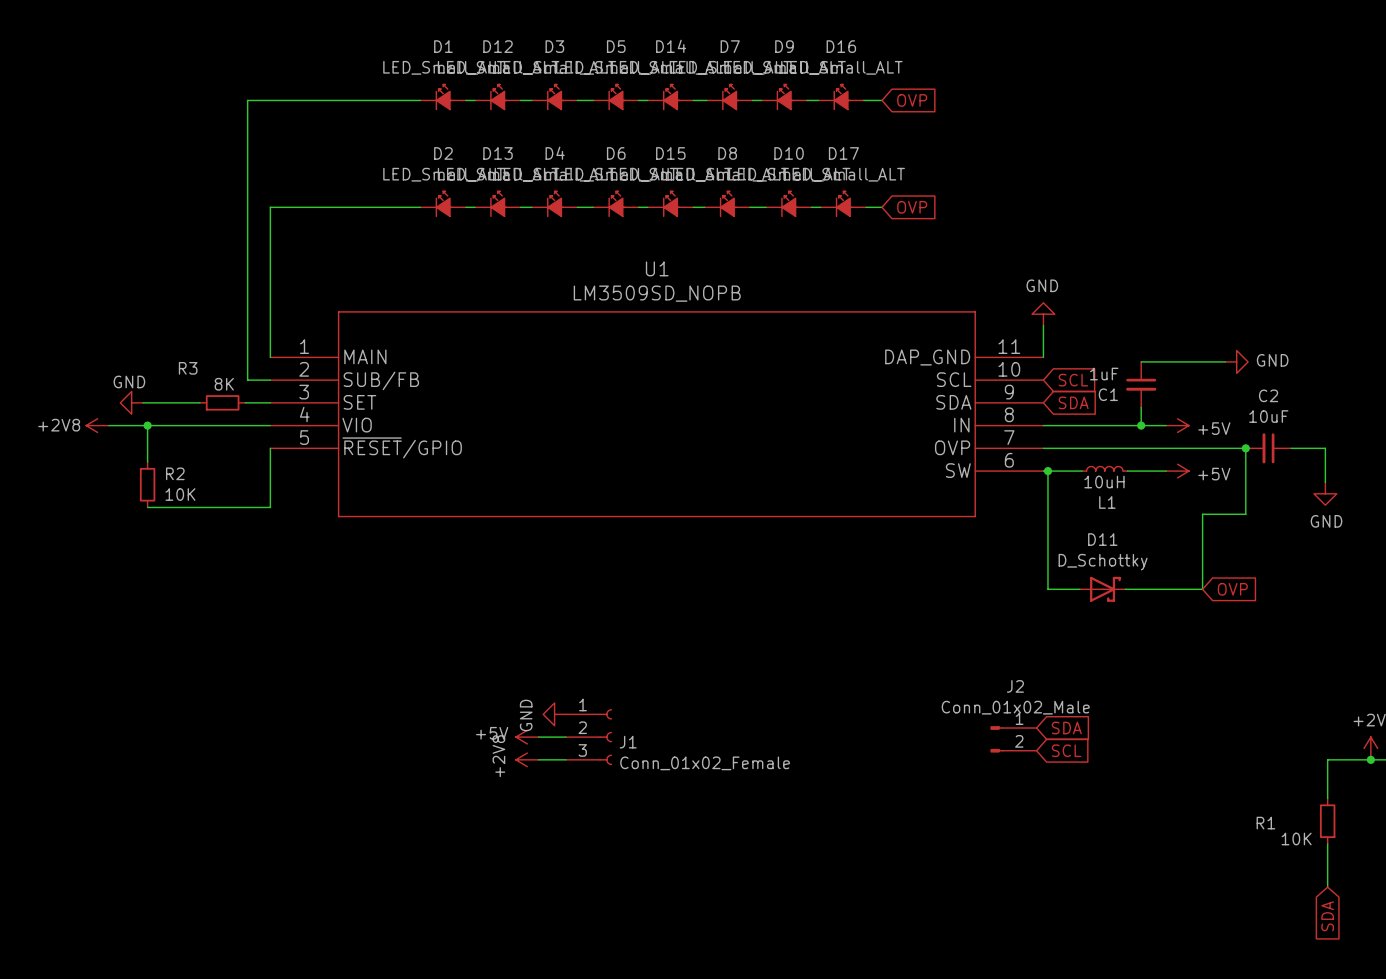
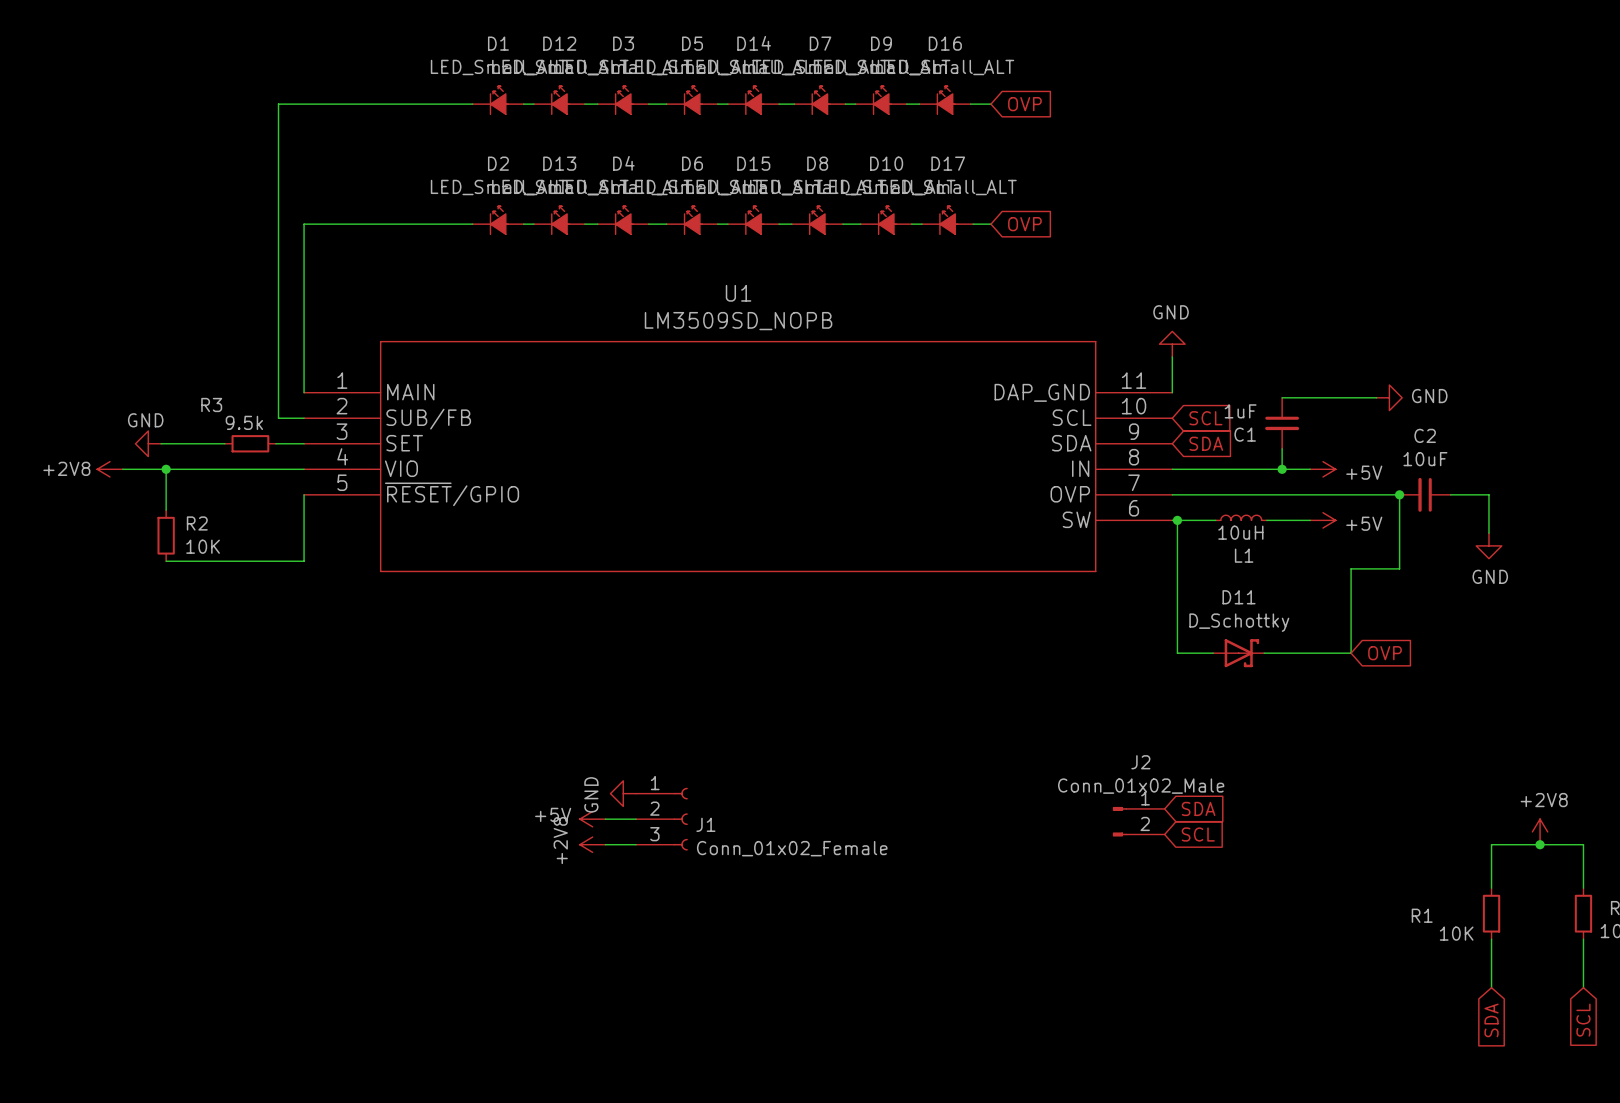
R3 value: 8K (224, 384) -> 9.5k (244, 422)

